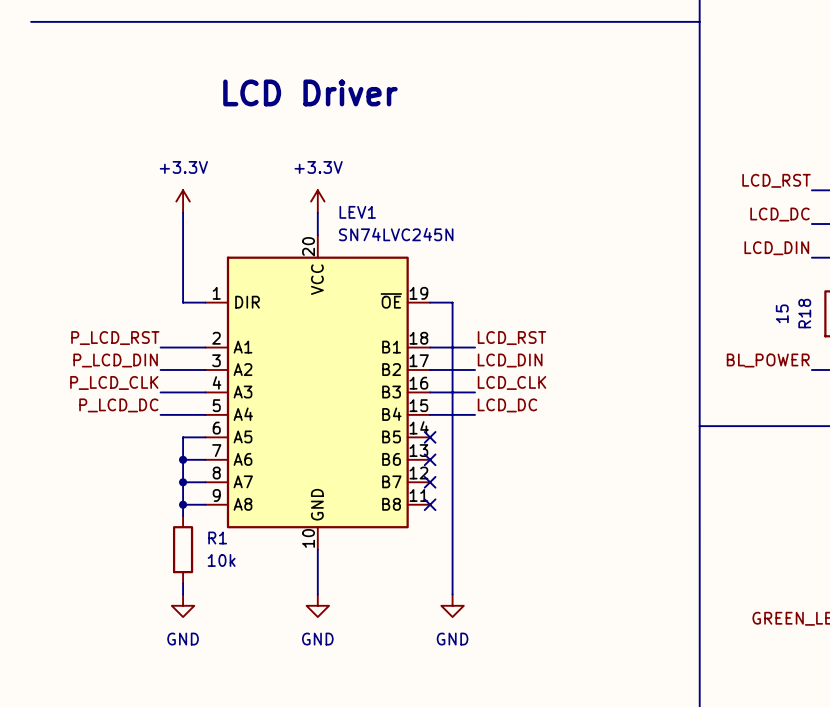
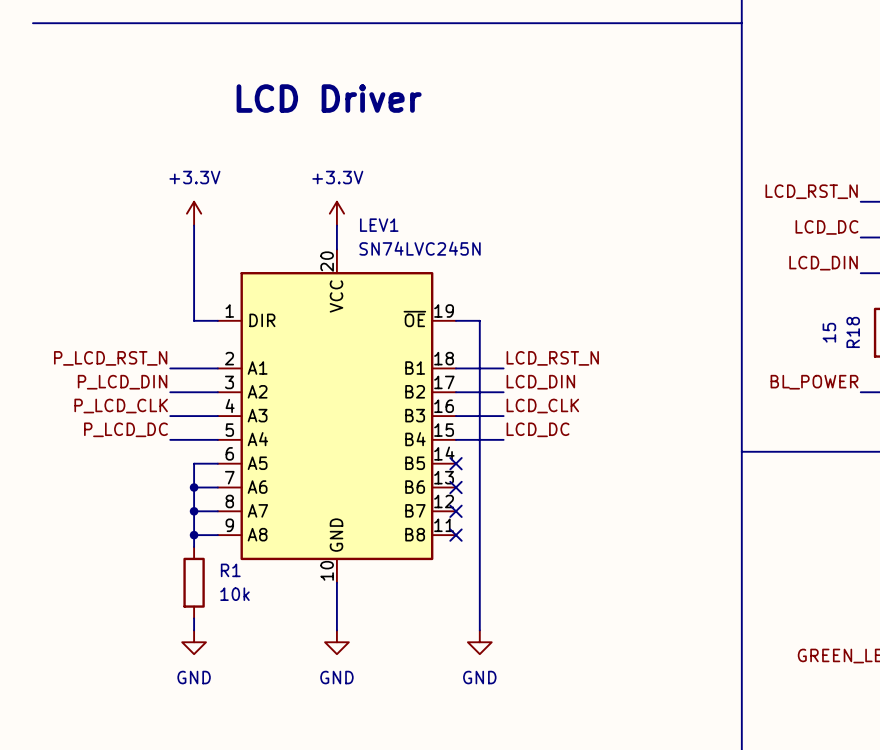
label: LCD_RST (776, 180) -> LCD_RST_N (811, 191)
label: P_LCD_RST (115, 338) -> P_LCD_RST_N (110, 358)
label: LCD_RST (512, 338) -> LCD_RST_N (552, 358)

